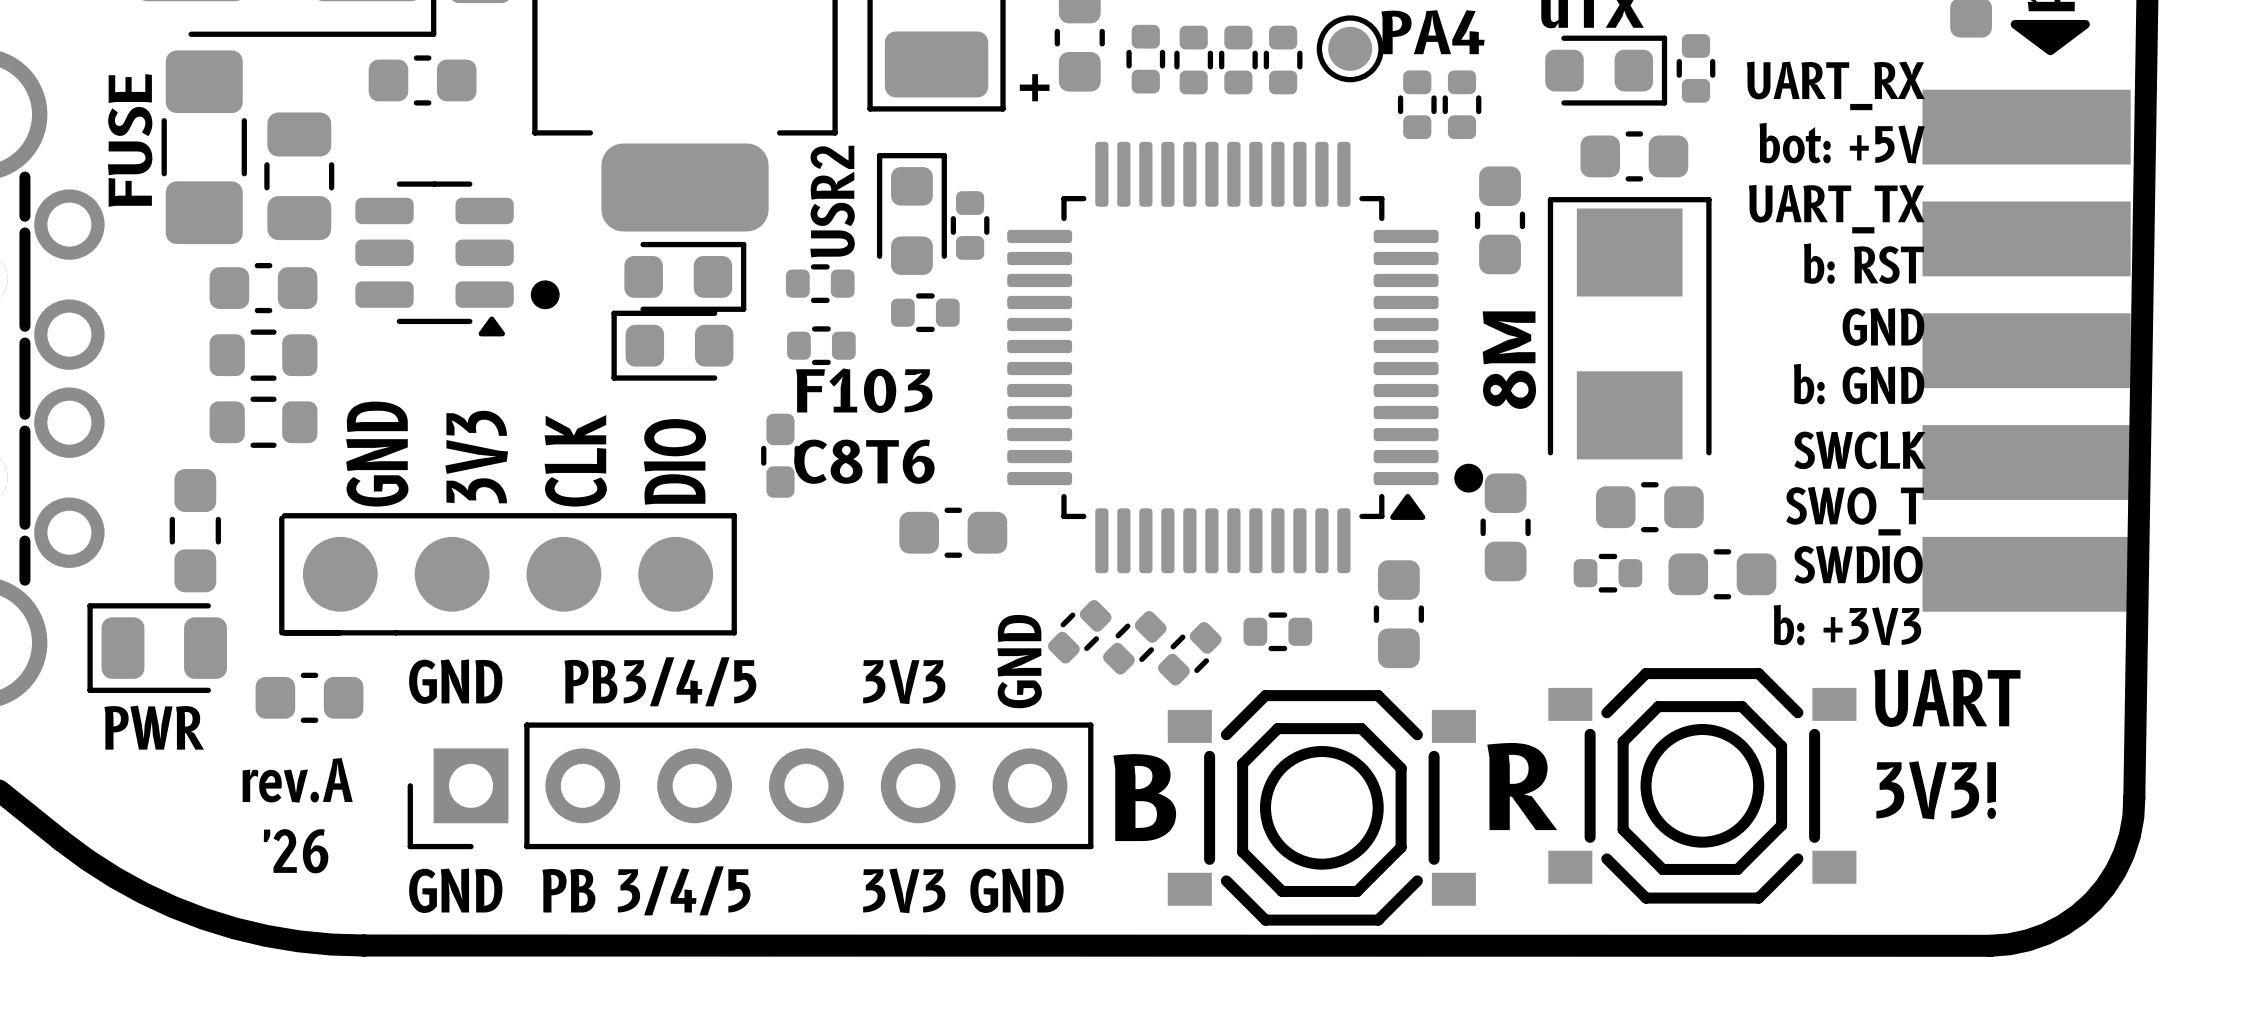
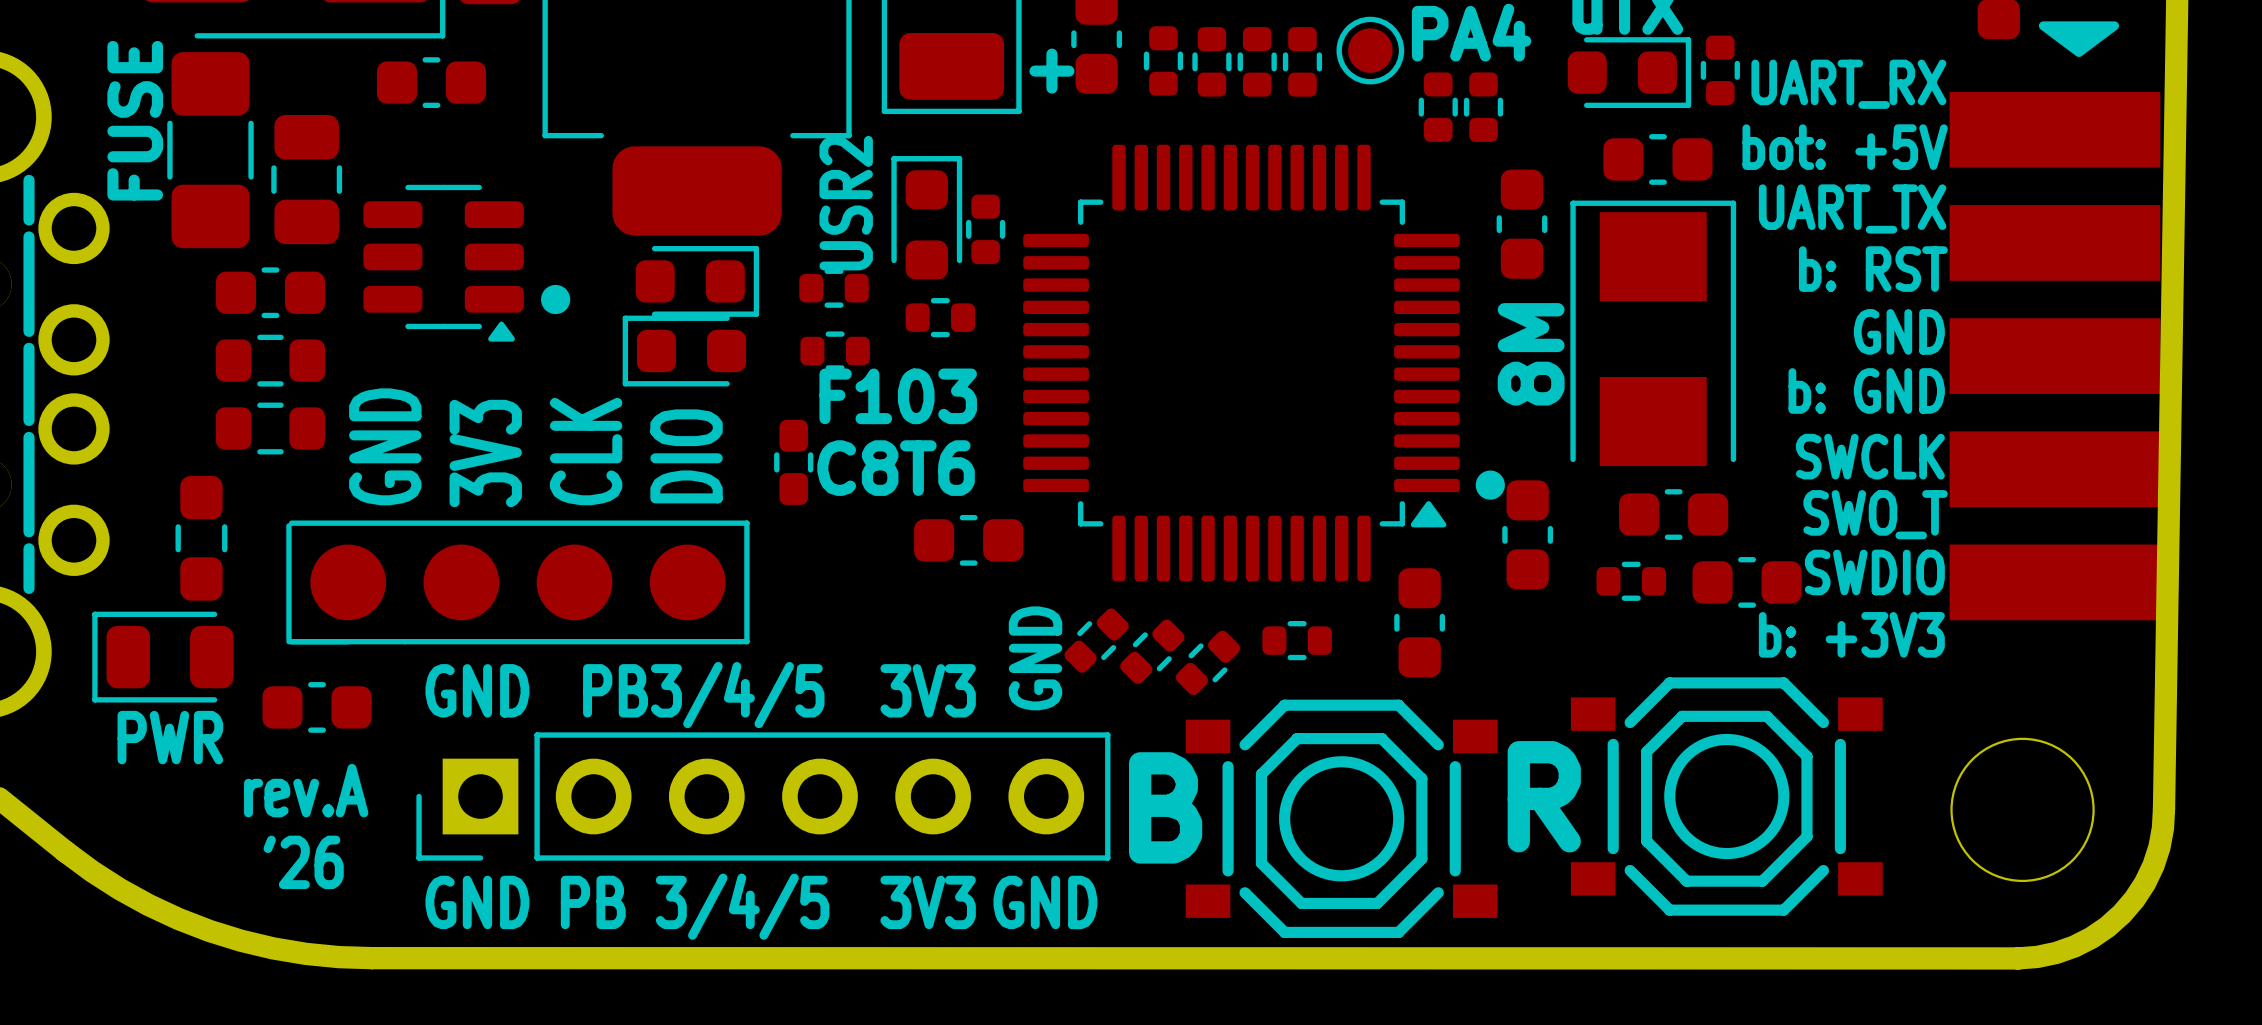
text: UART (1947, 698) -> none
round board edge: none -> [1950, 737, 2095, 883]
text: 3V3! (1936, 790) -> none

